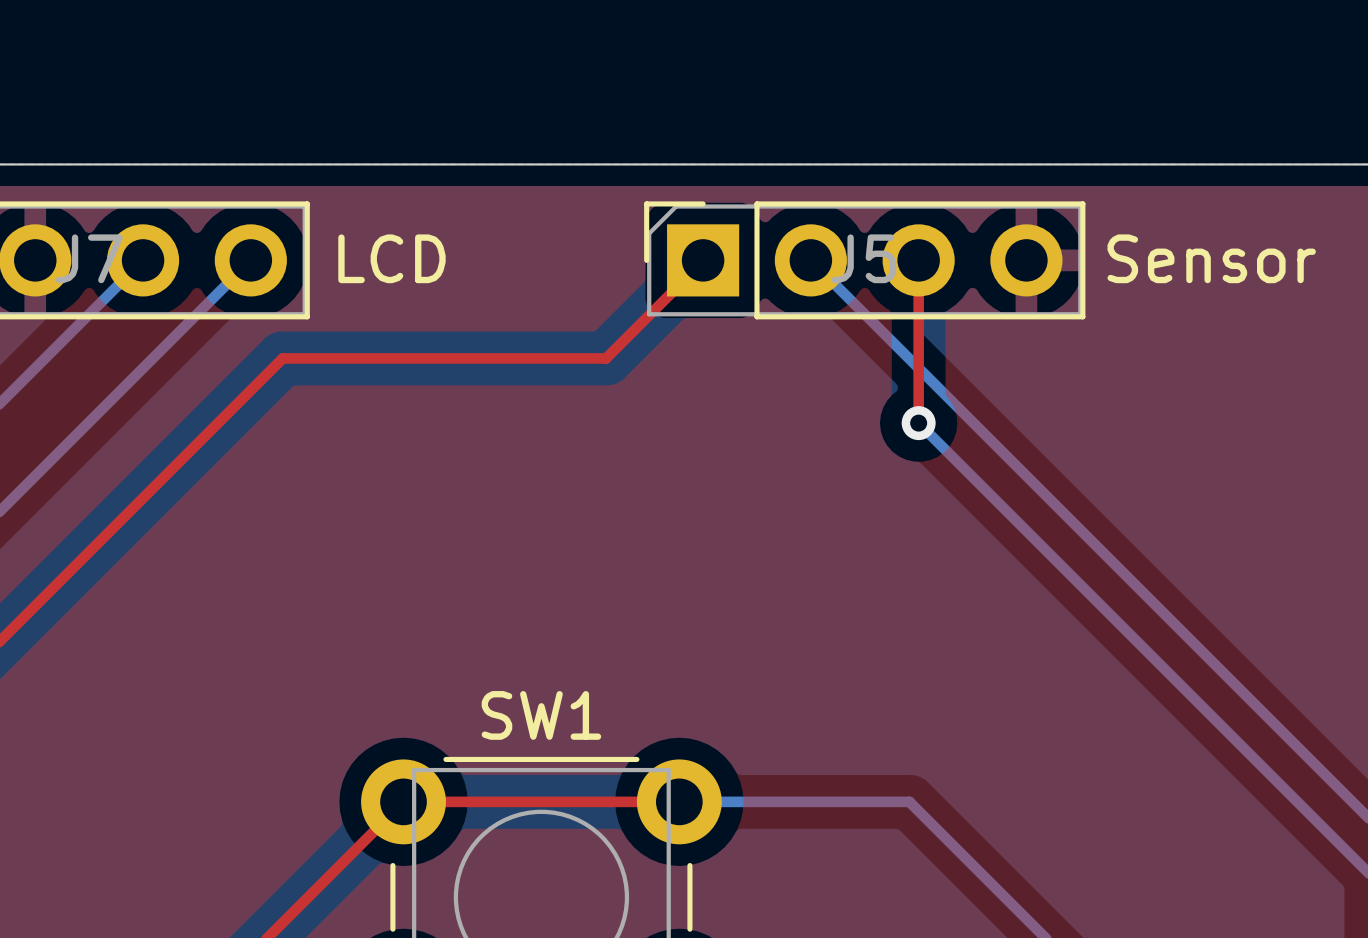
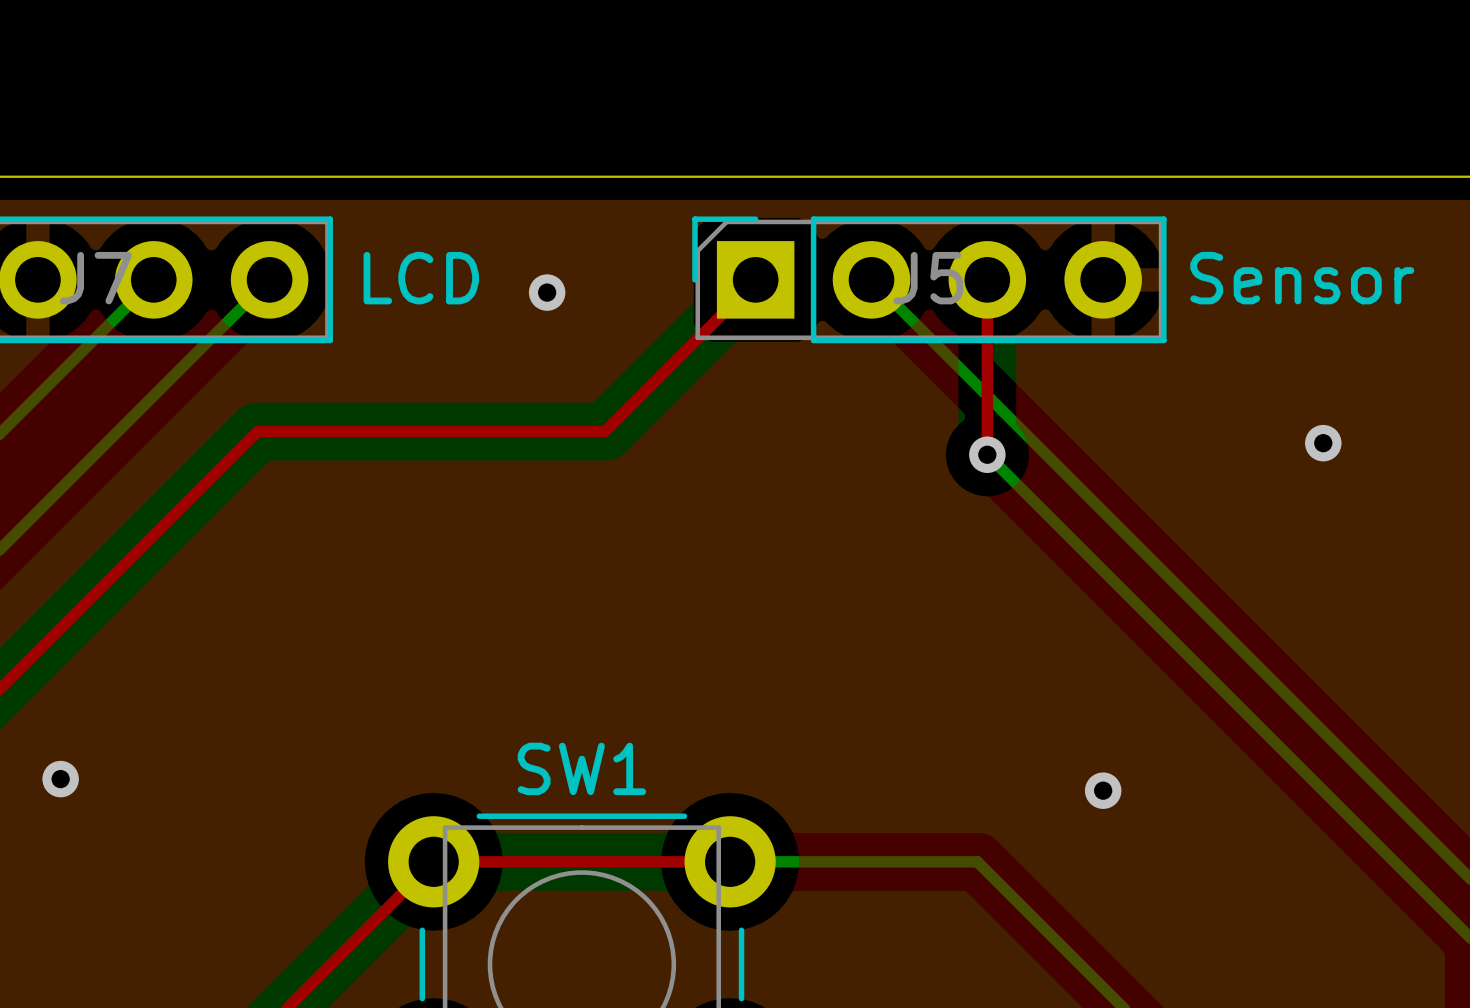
via: none -> (547, 292)
top track: (606, 358) (282, 358) (239, 401) -> (651, 385) (605, 431) (257, 431)
via: none -> (1323, 443)
via: none -> (60, 779)
via: none -> (1103, 790)

